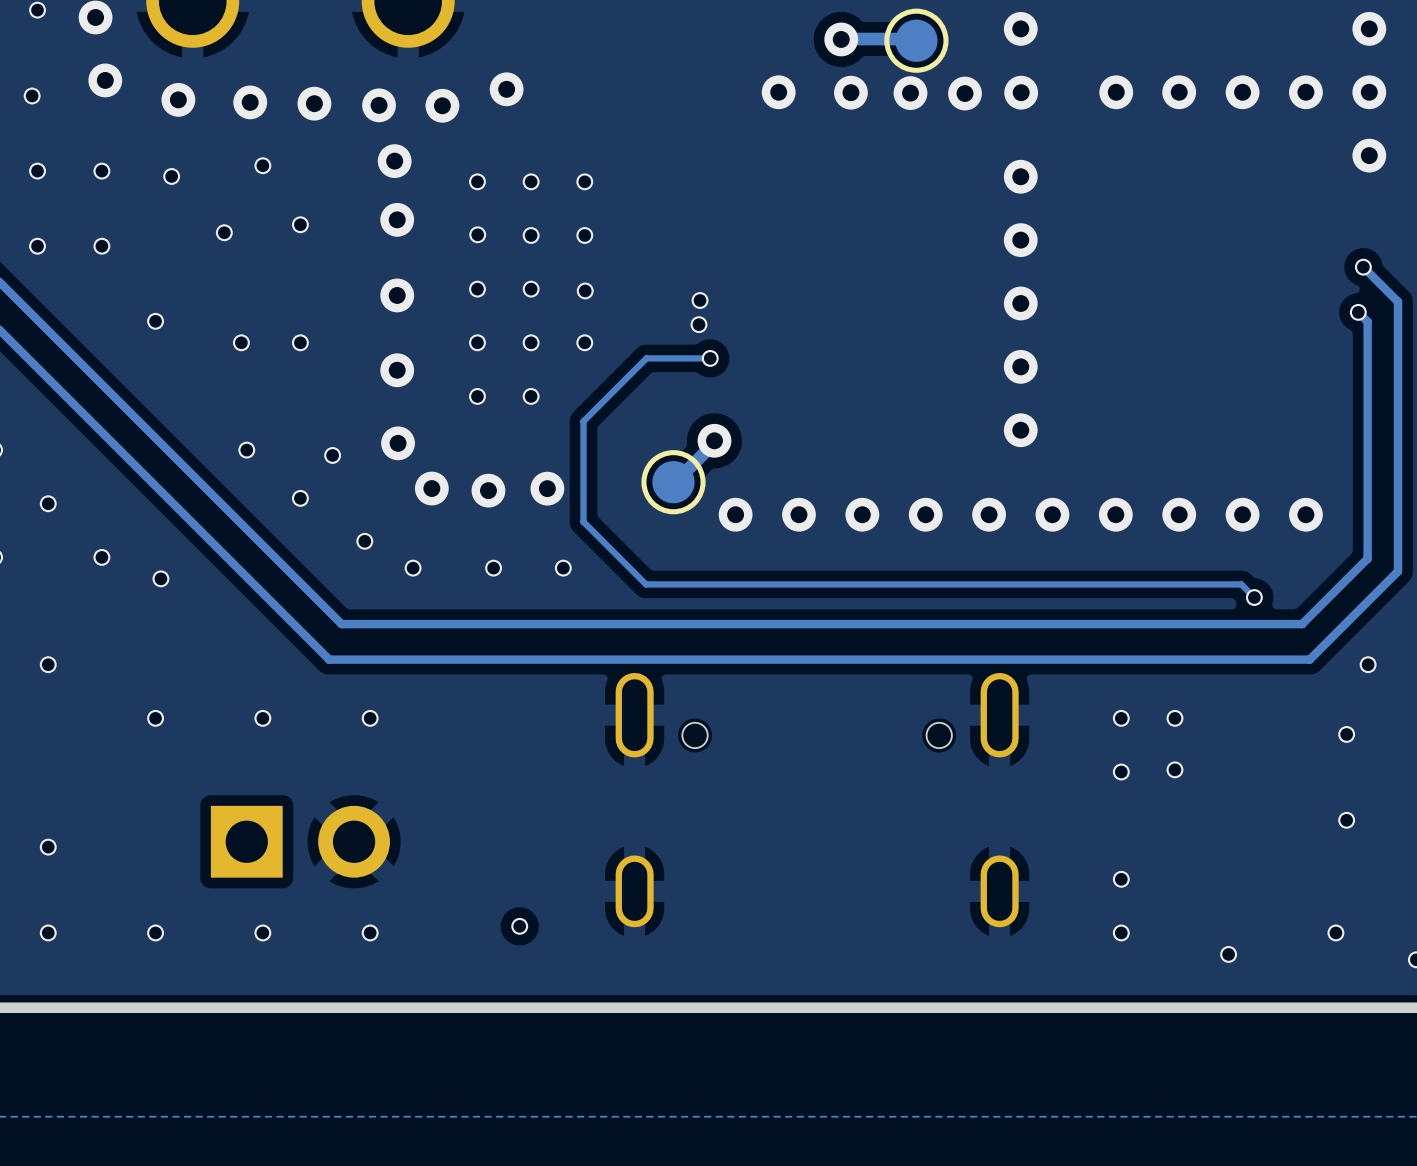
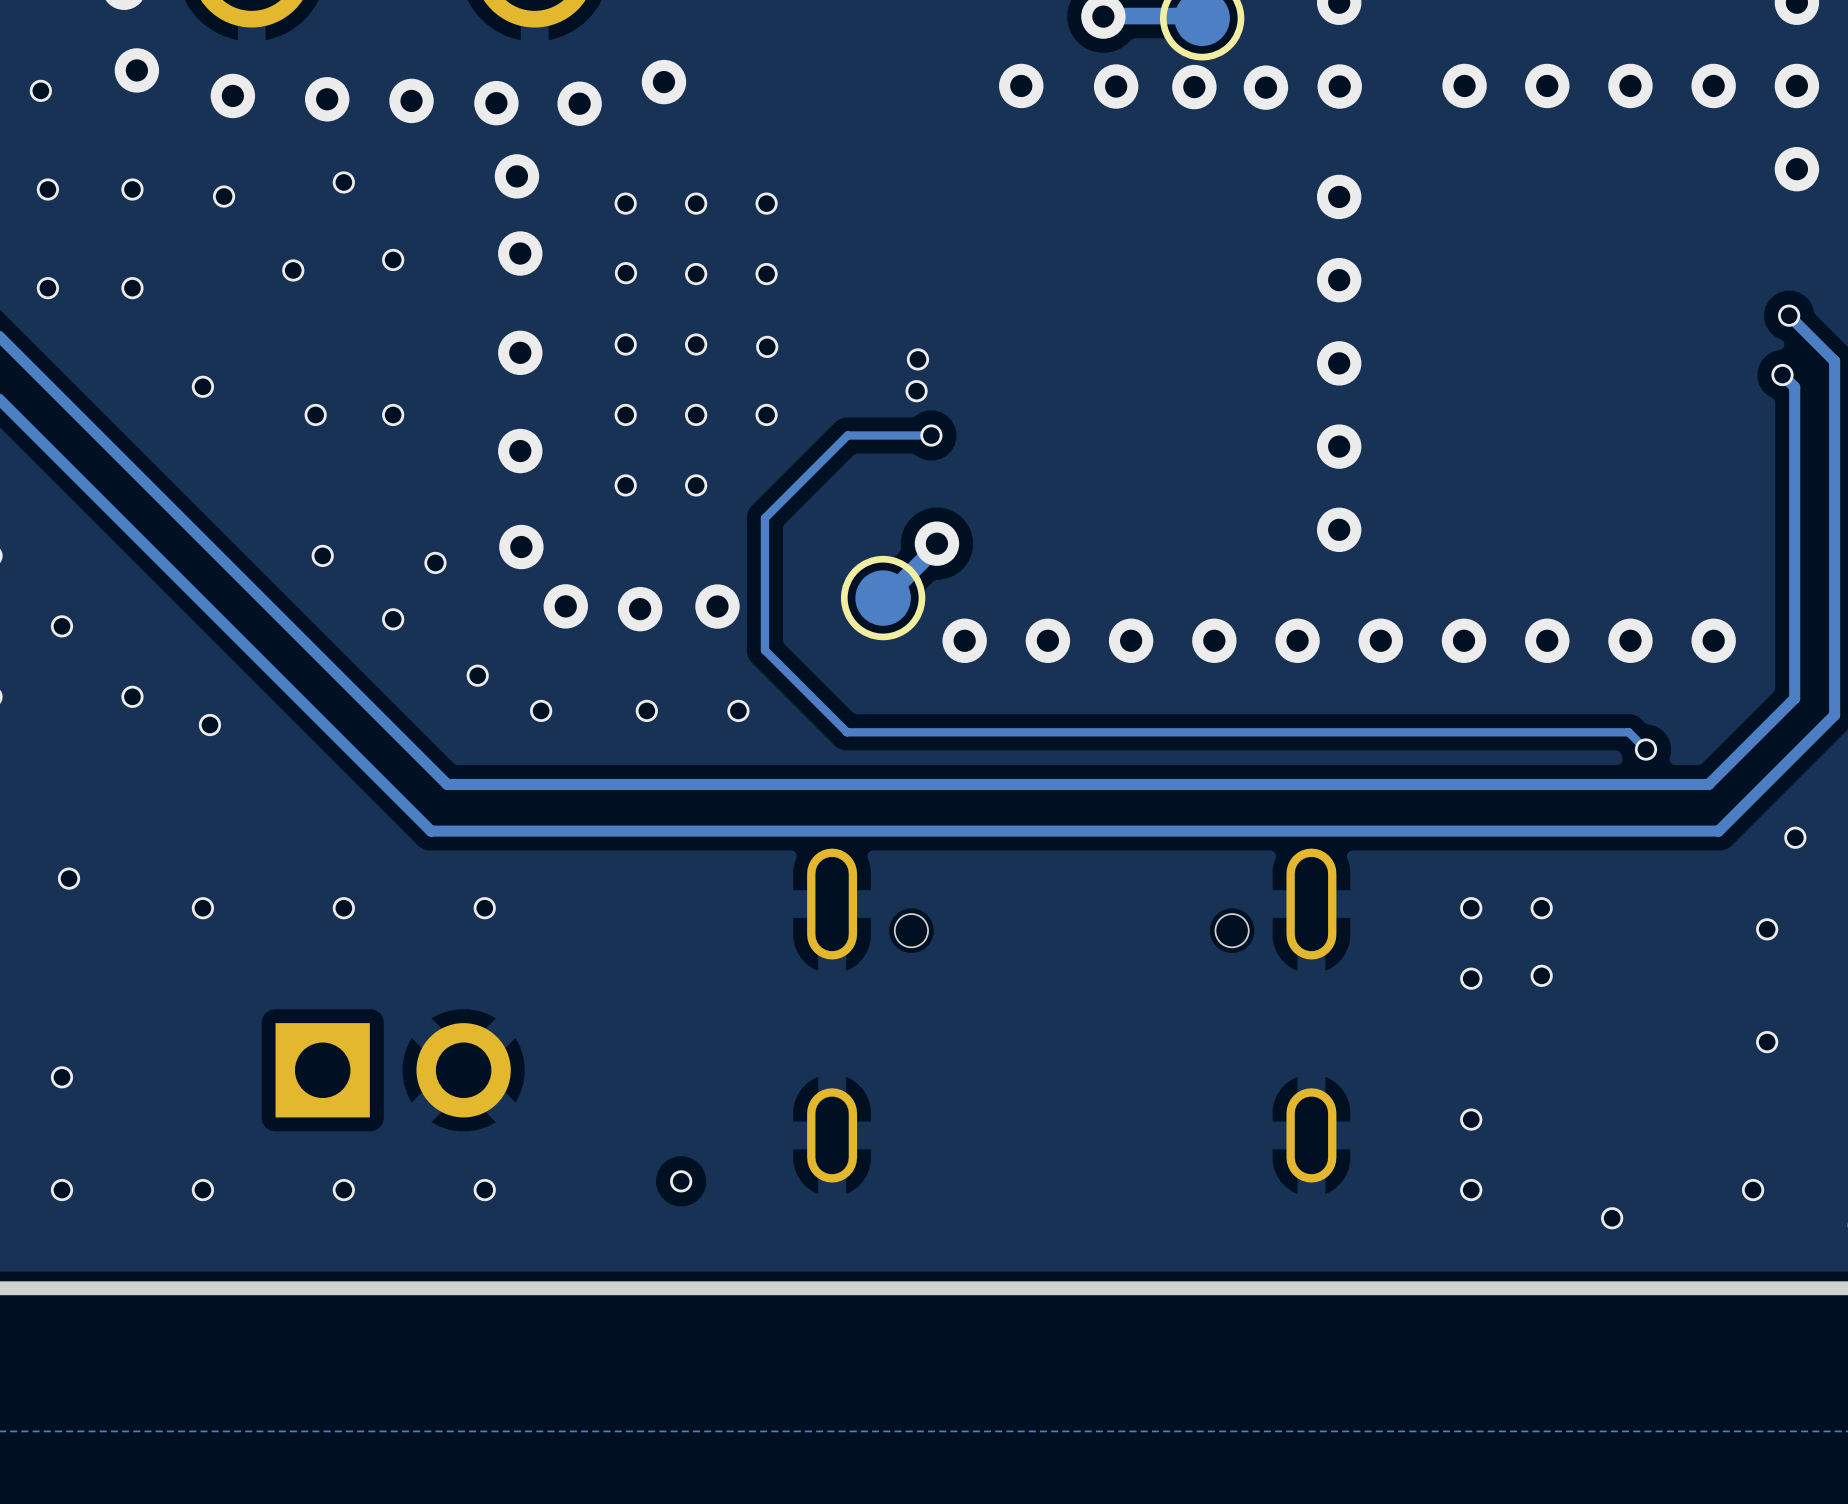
via position: (48, 664) -> (69, 878)

